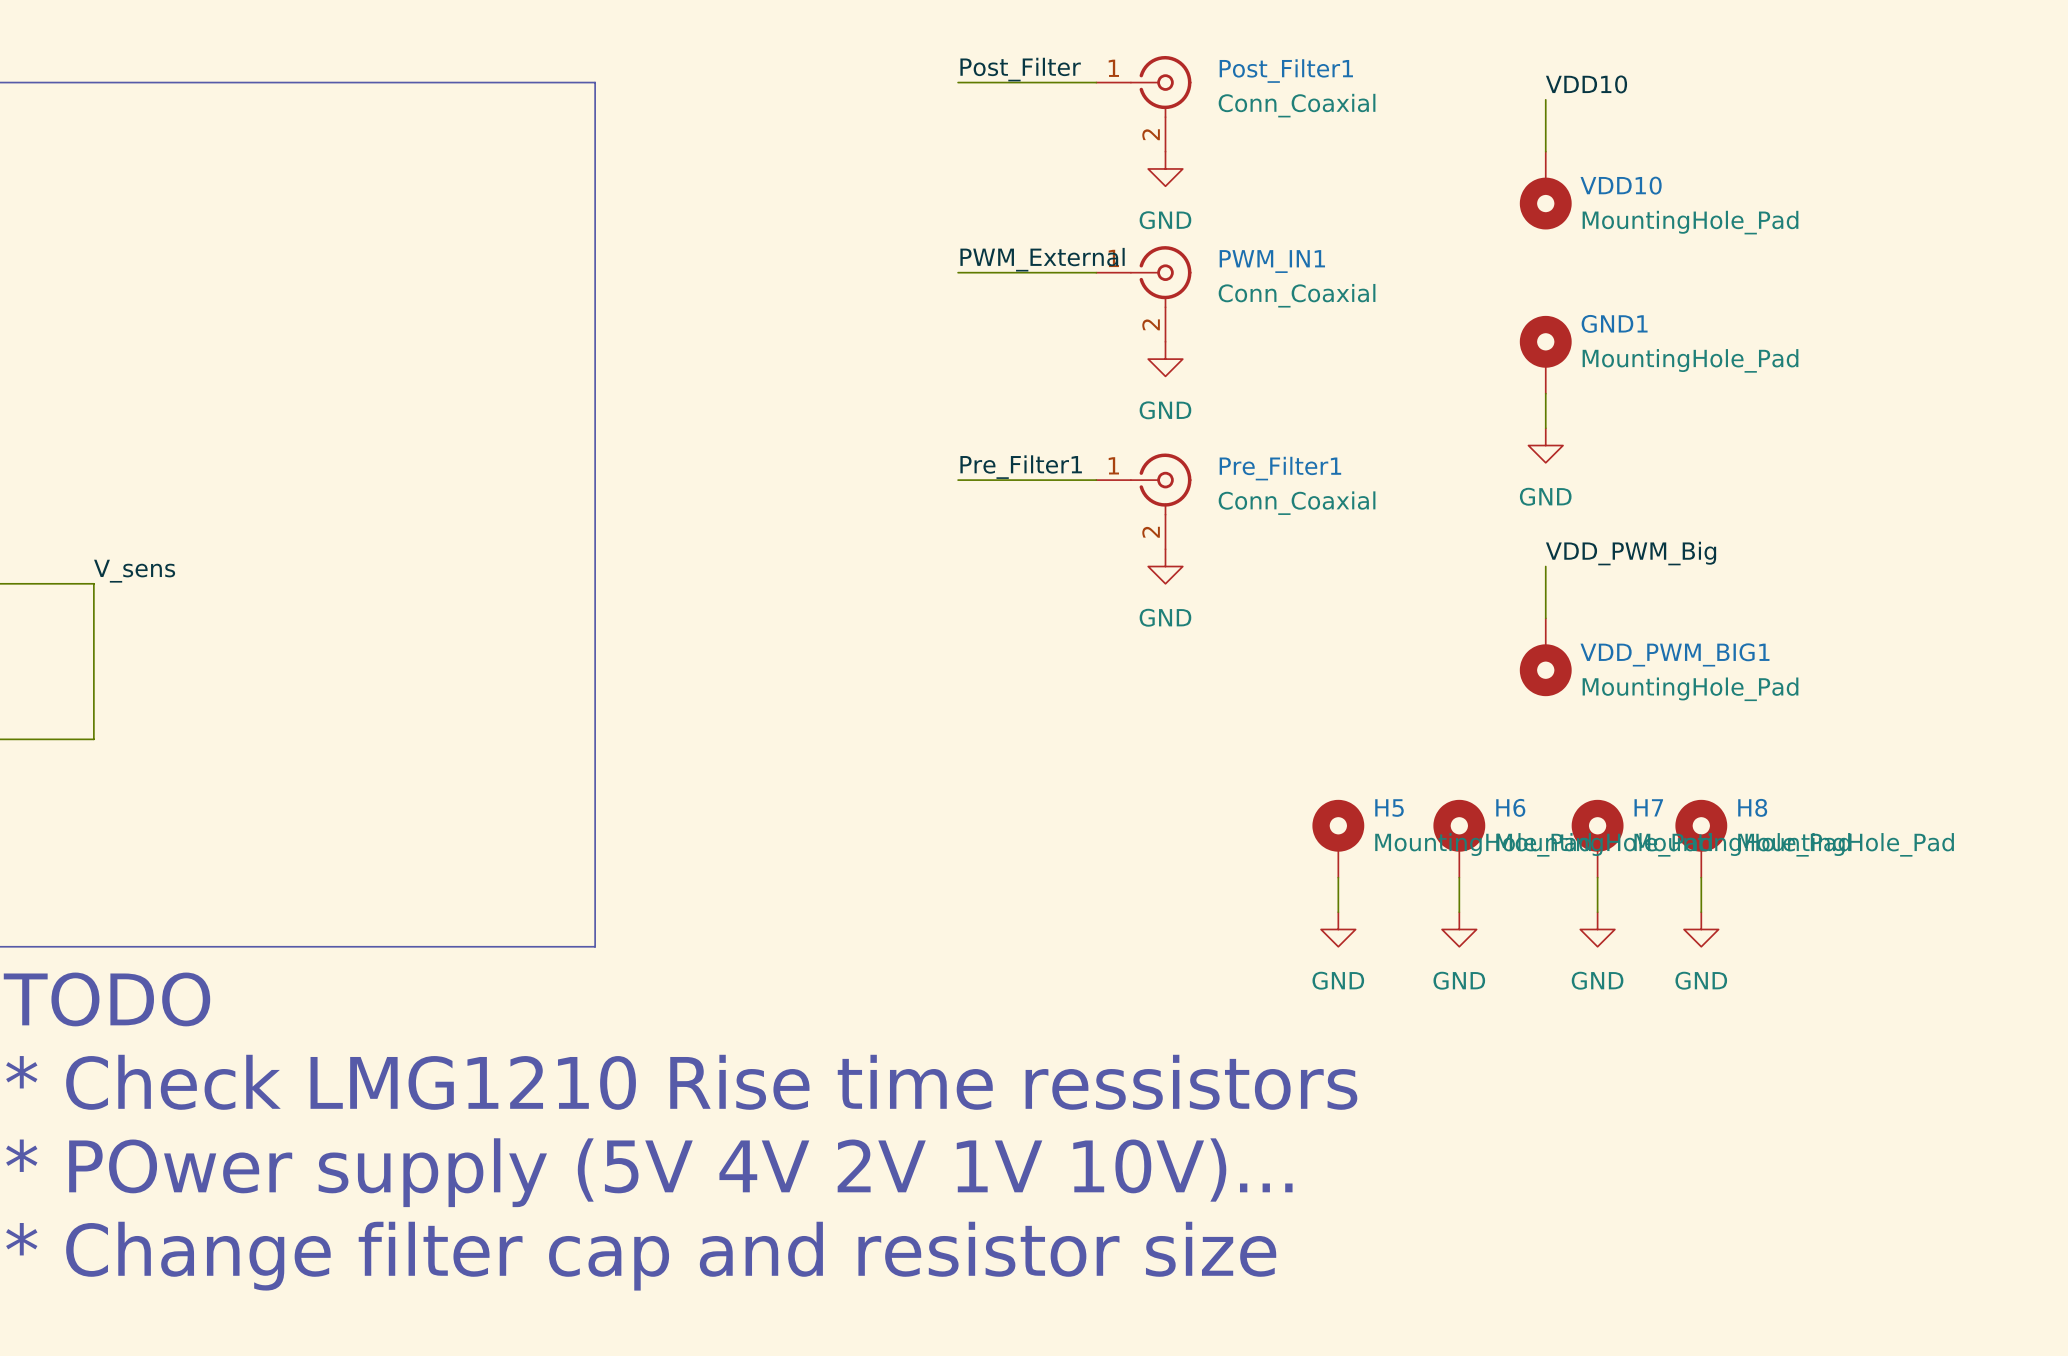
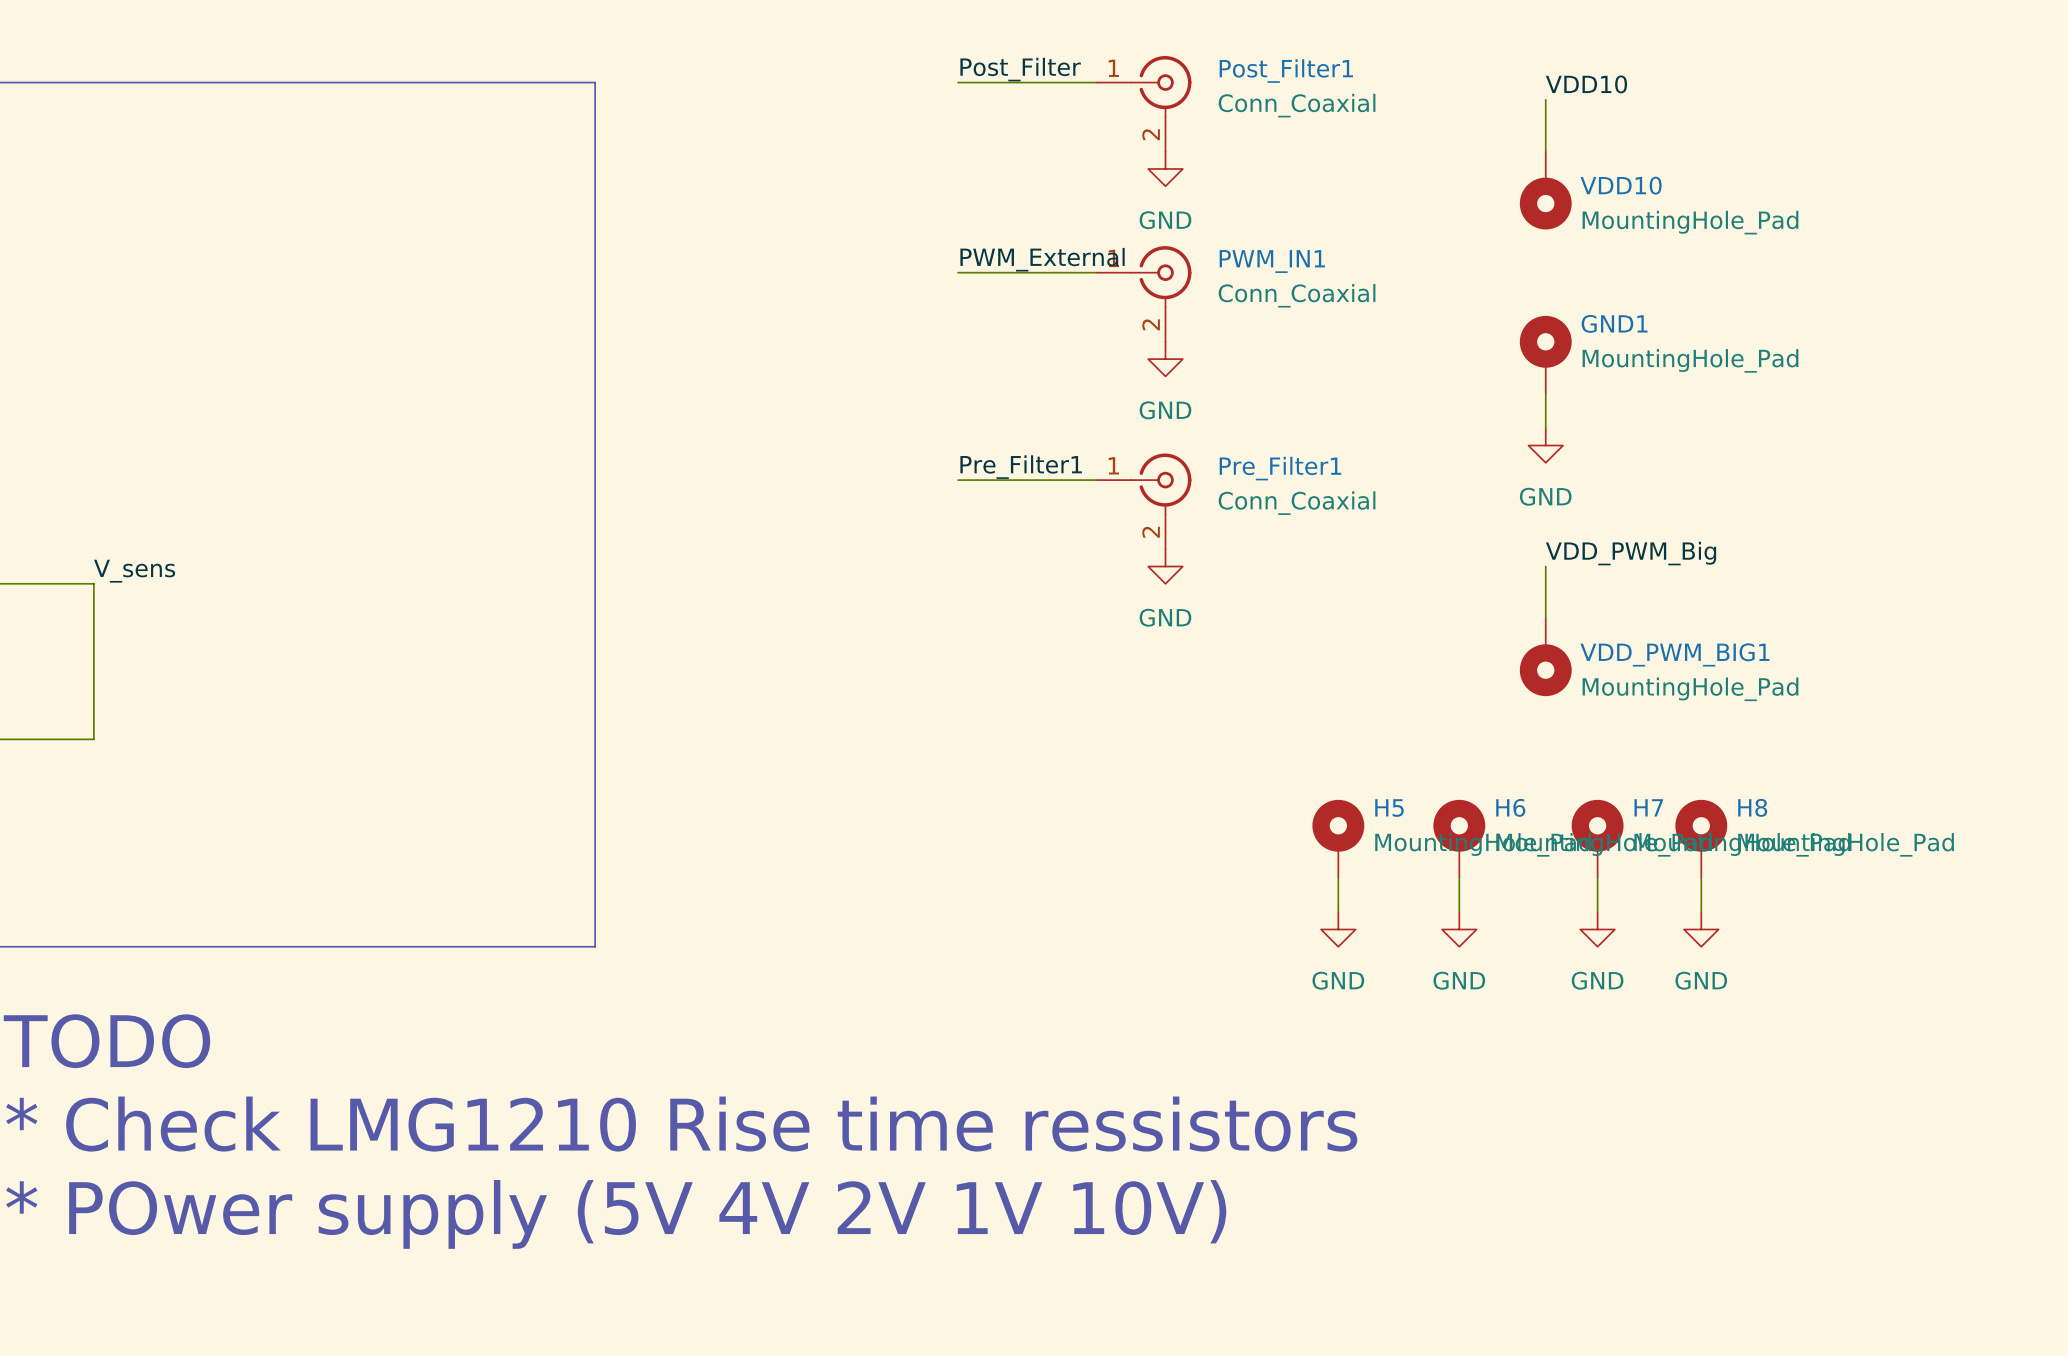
text position: TODO (106, 999) -> TODO (106, 1041)
text position: * Check LMG1210 Rise time ressistors (681, 1082) -> * Check LMG1210 Rise time ressistors (681, 1124)
text: * POwer supply (5V 4V 2V 1V 10V)... (649, 1172) -> * POwer supply (5V 4V 2V 1V 10V) (616, 1214)
text: * Change filter cap and resistor size (641, 1256) -> none

